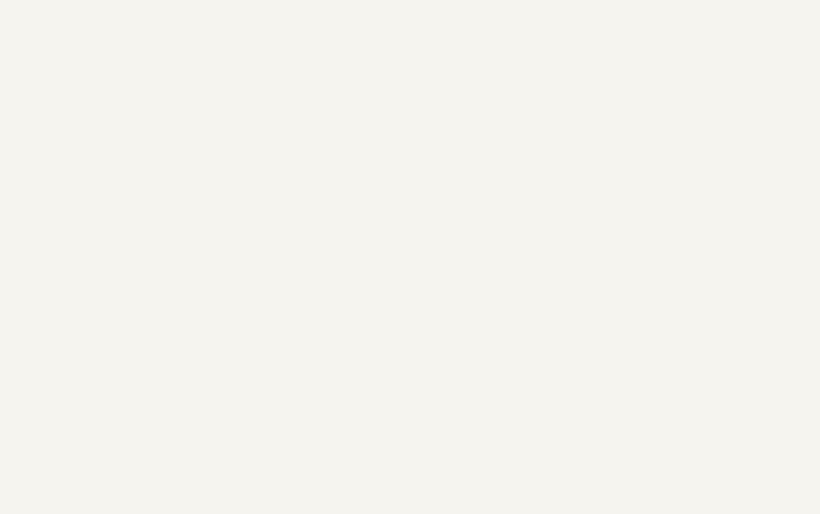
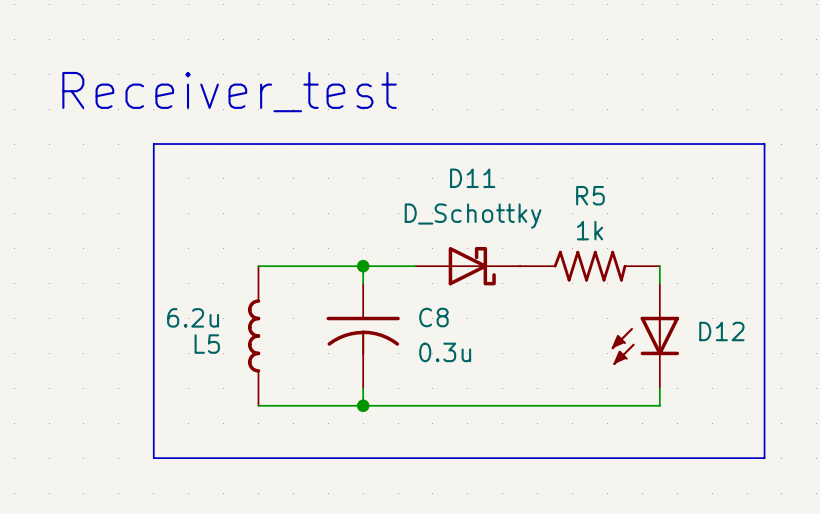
text: none -> Receiver_test (229, 92)
bus: none -> (153, 144) (153, 458) (764, 458) (764, 144) (153, 144)
wire: none -> (258, 266) (415, 266)
wire: none -> (363, 266) (363, 283)
junction: none -> (363, 266)
D11: none -> D_Schottky (467, 266)
R5: none -> 1k (590, 266)
wire: none -> (659, 266) (659, 283)
L5: none -> 6.2u (254, 335)
C8: none -> 0.3u (363, 335)
D12: none -> (645, 335)
wire: none -> (363, 388) (363, 405)
wire: none -> (659, 388) (659, 405) (258, 405)
junction: none -> (363, 405)

